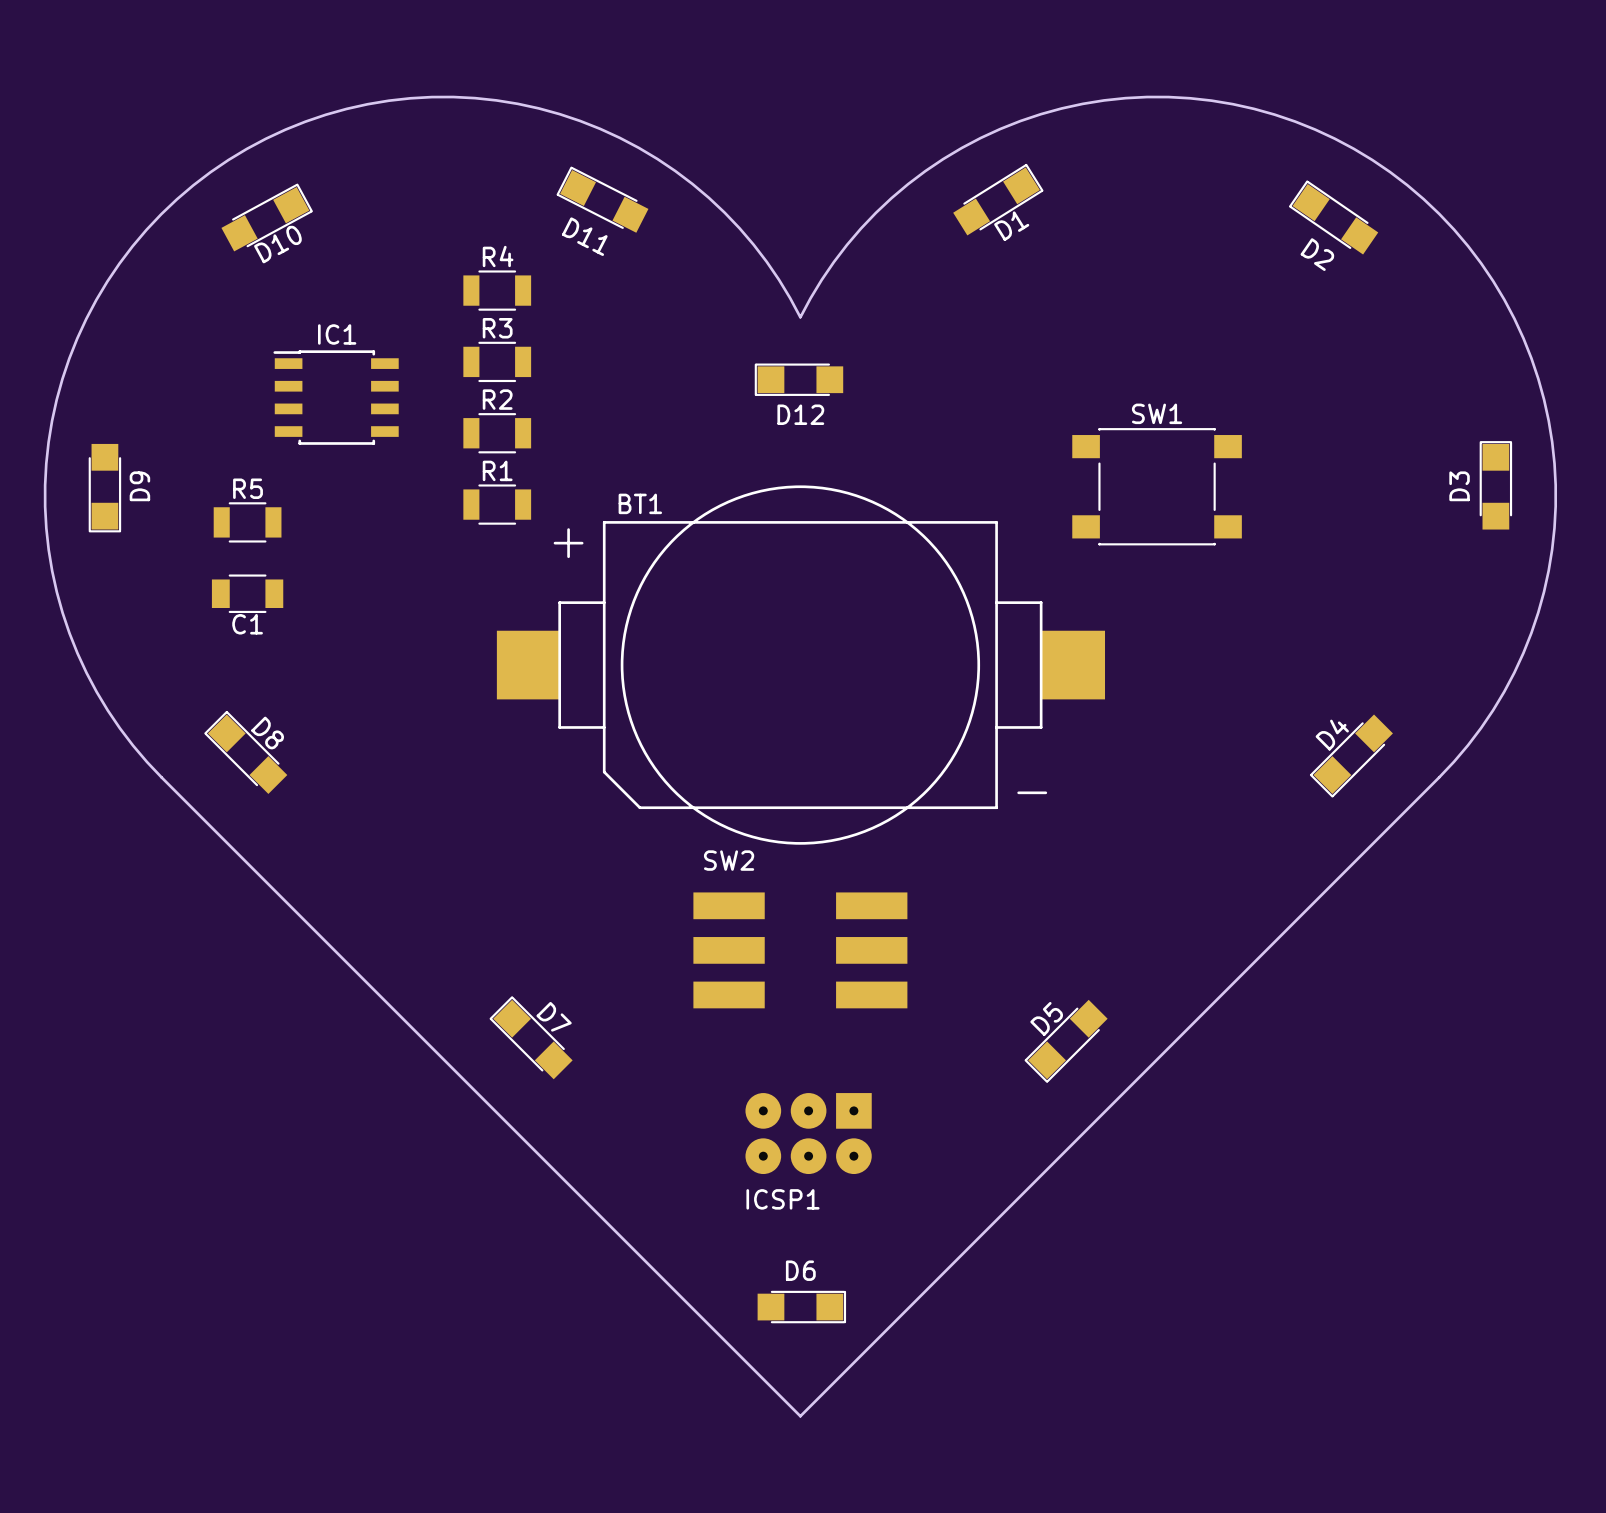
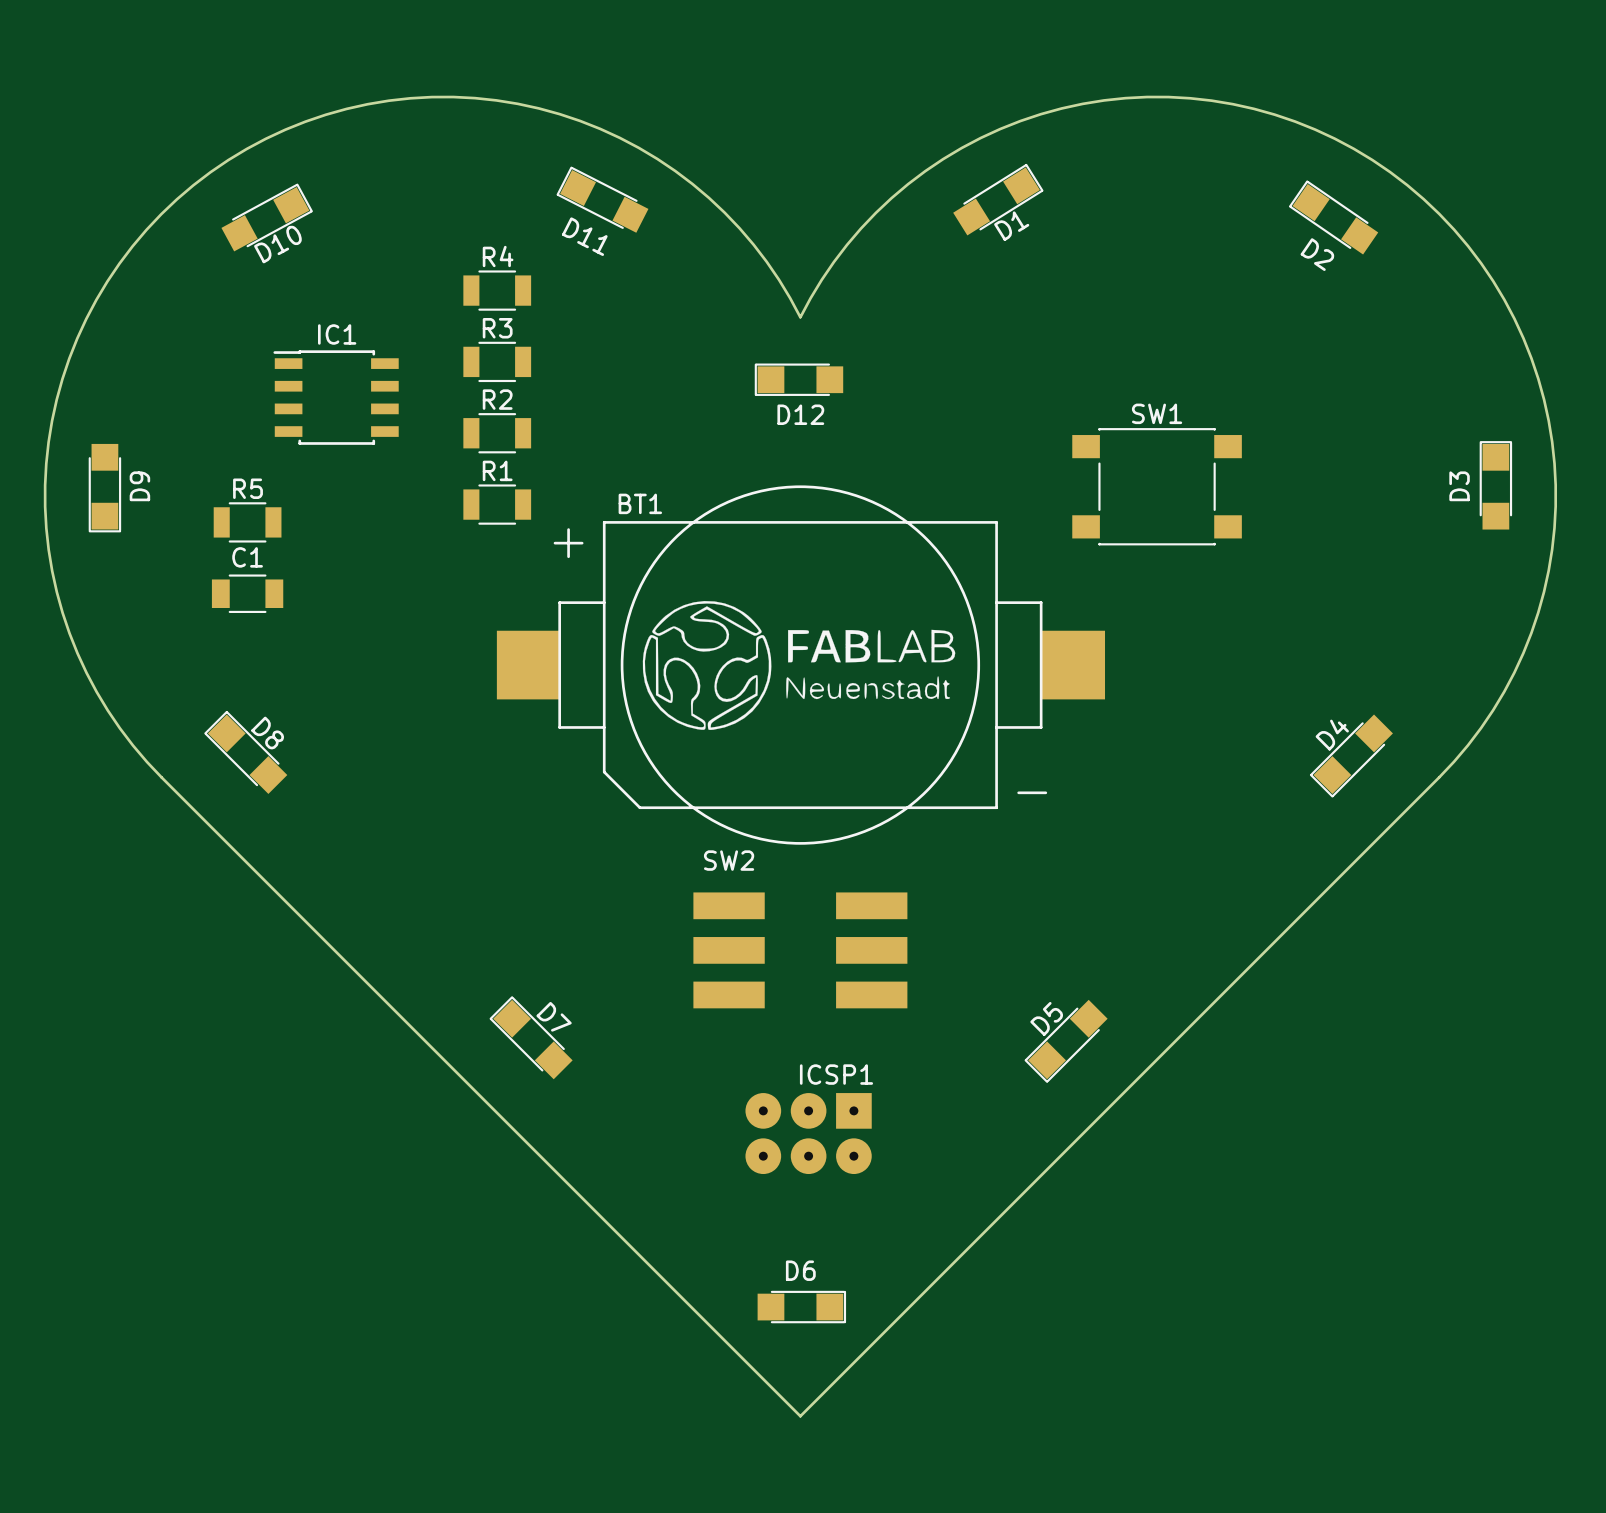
drawing: none -> [642, 601, 956, 730]
C1 name position: C1 (247, 624) -> C1 (247, 557)
ICSP1 name position: ICSP1 (782, 1199) -> ICSP1 (836, 1074)

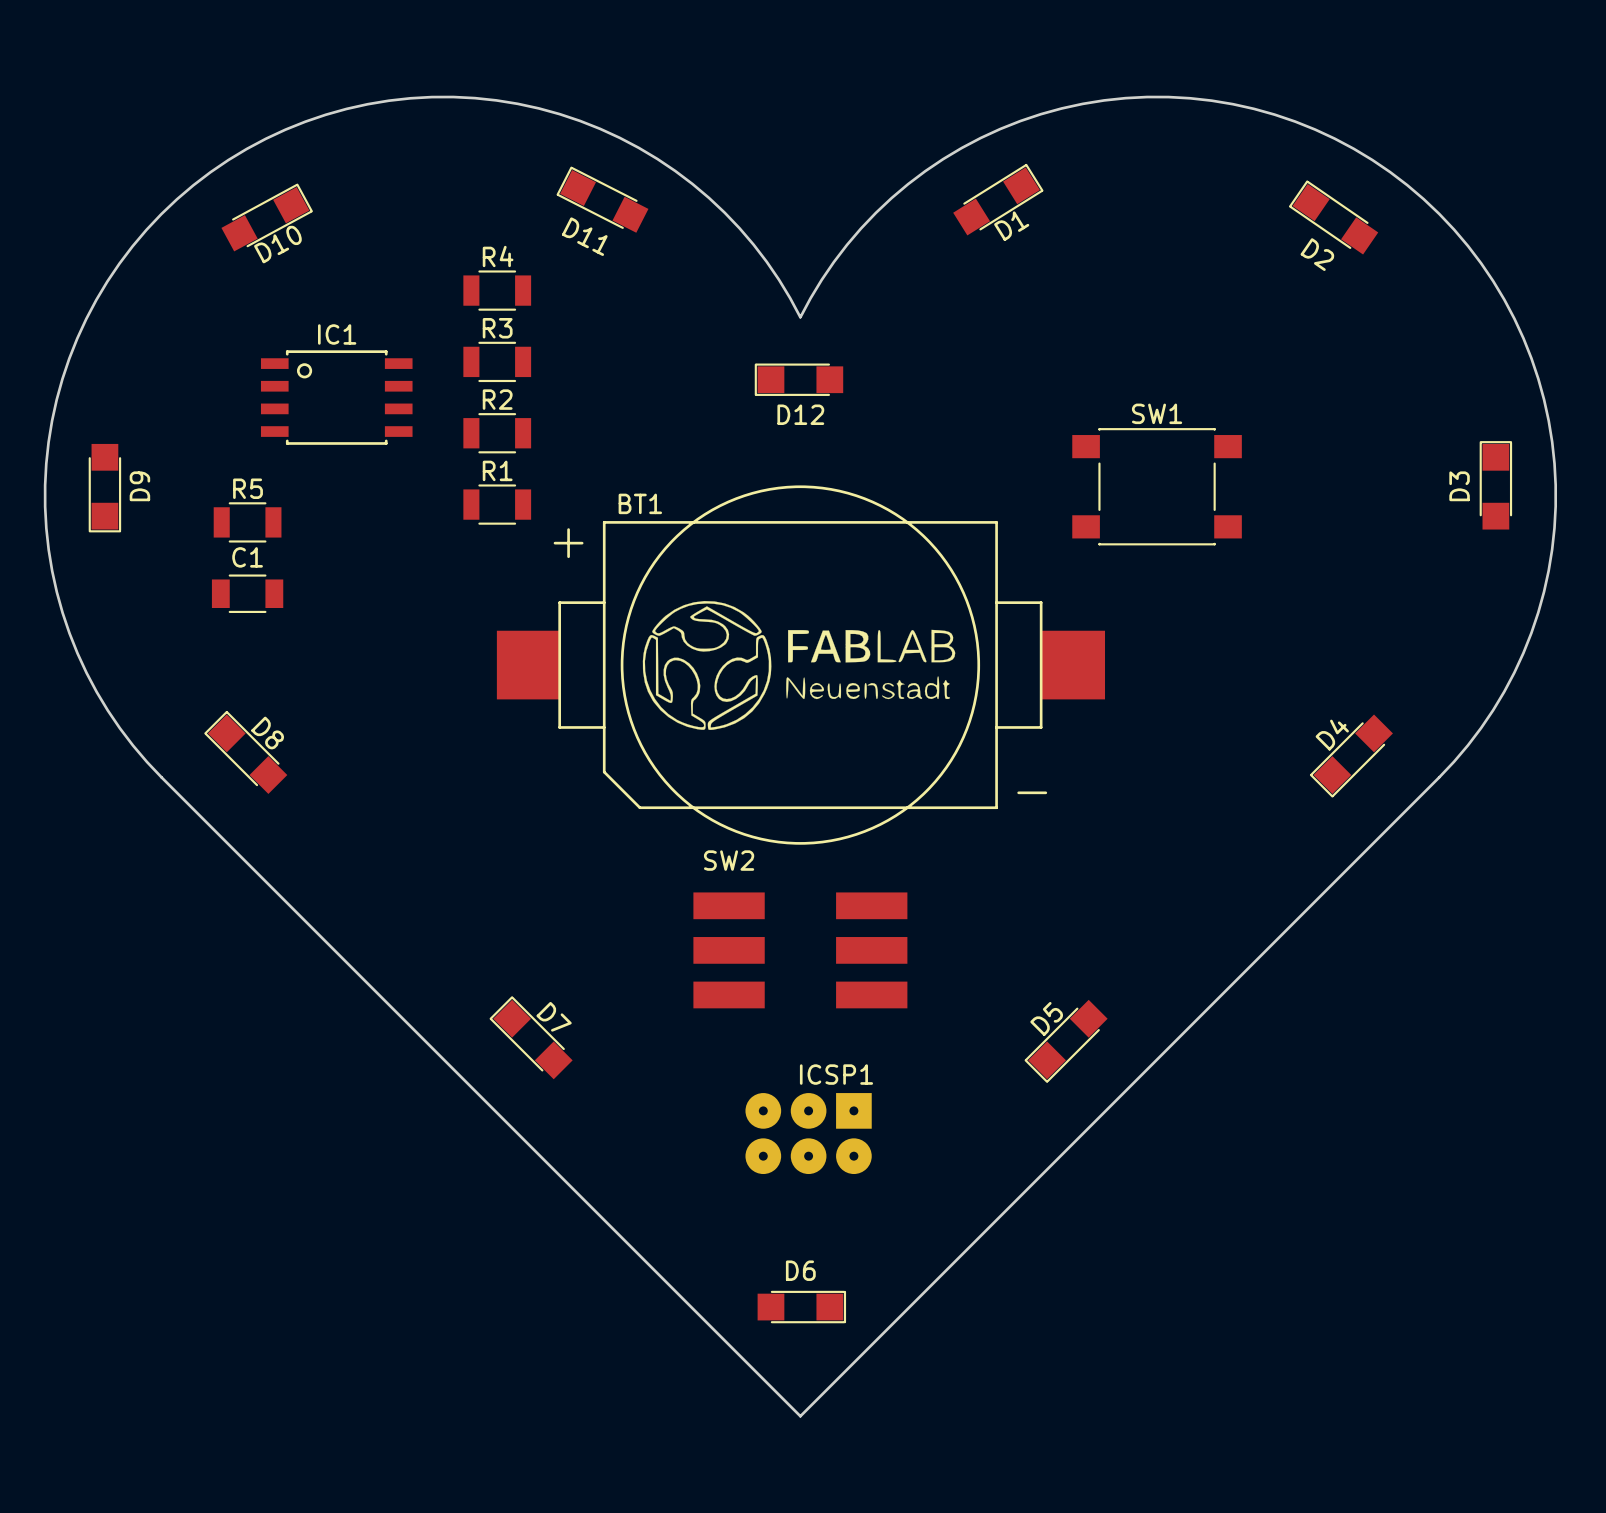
IC1 footprint: [273, 350, 399, 445] -> [260, 350, 413, 445]

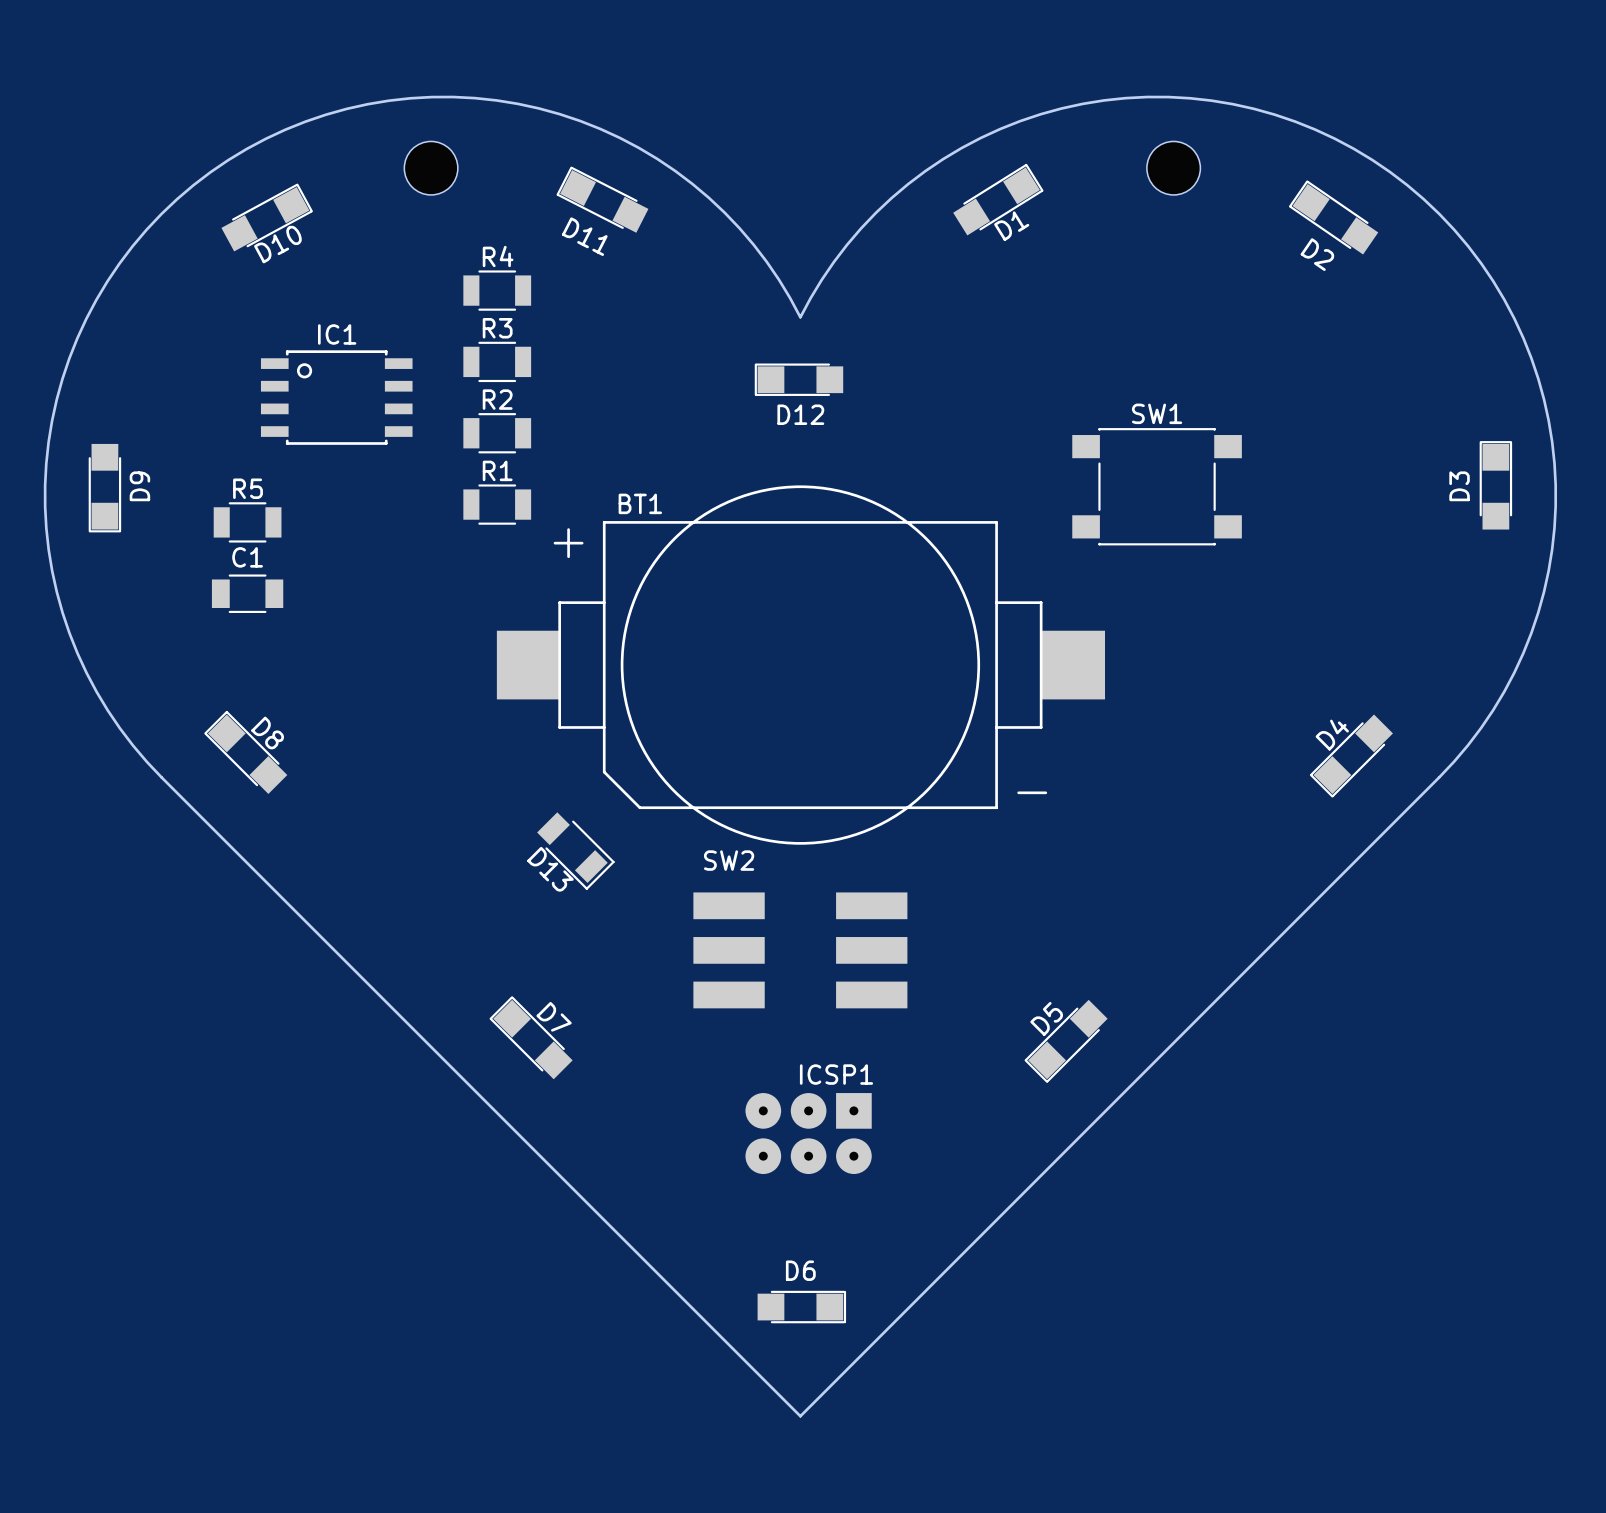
part: none -> (431, 168)
part: none -> (1173, 168)
drawing: [642, 601, 956, 730] -> none
D13: none -> (575, 851)

